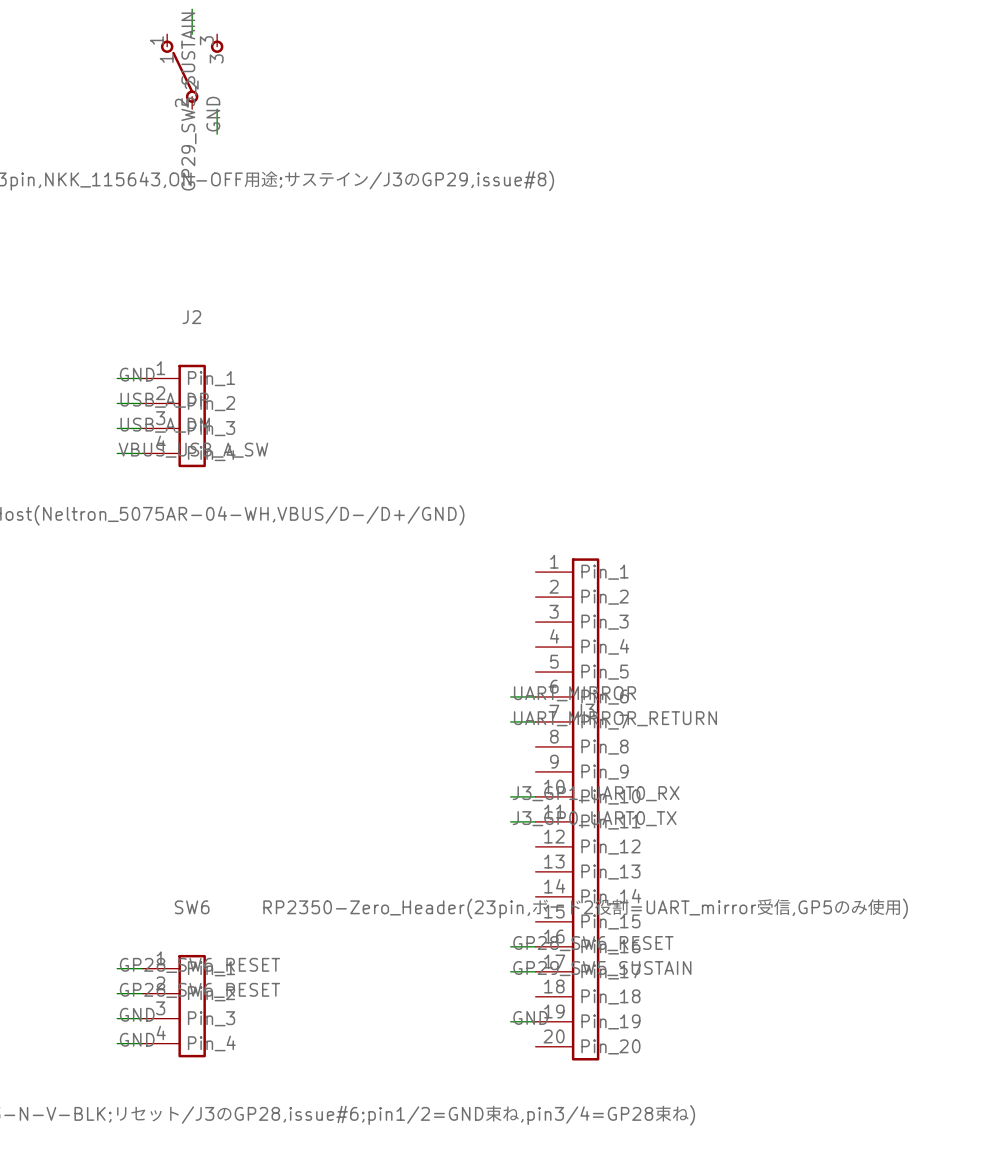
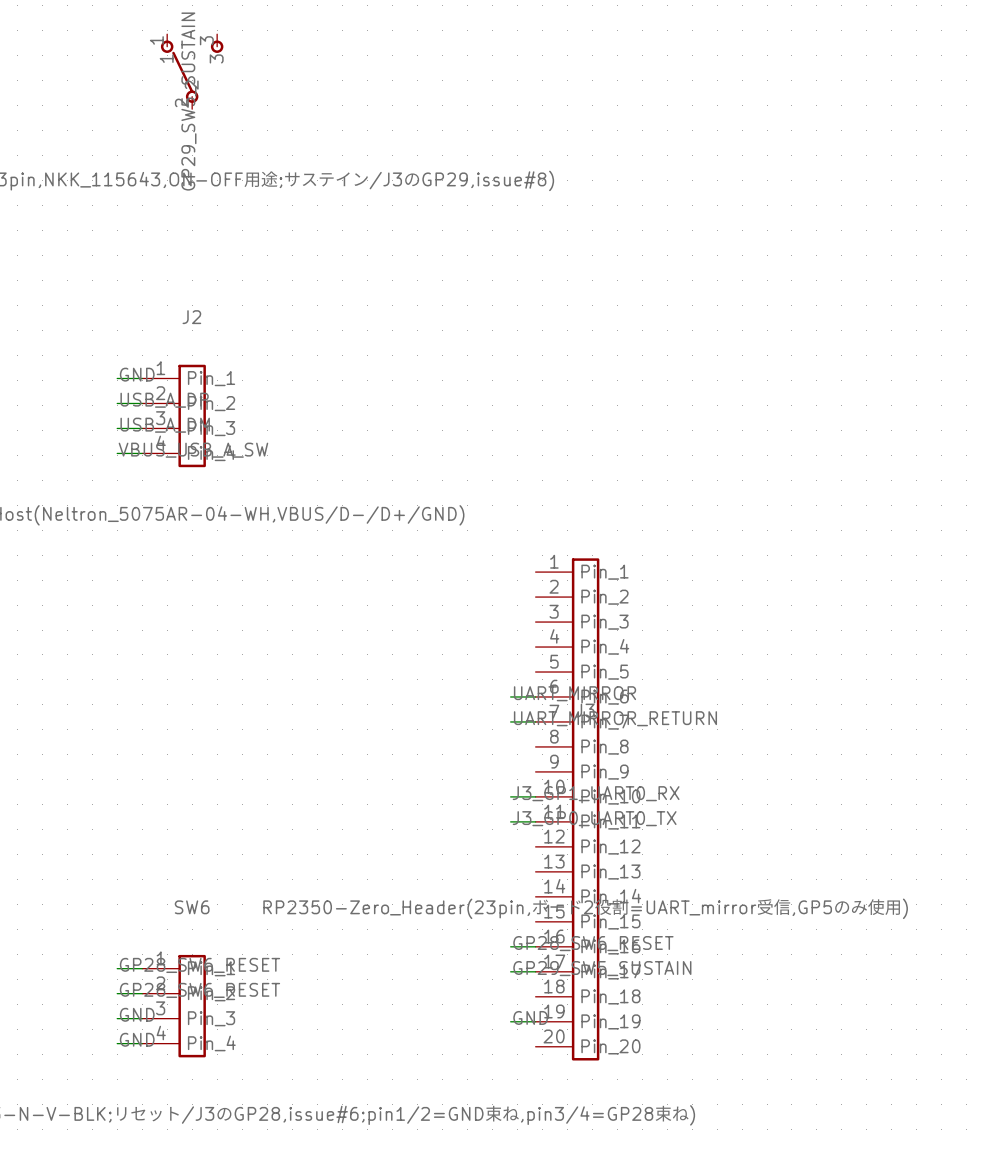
wire: (192, 9) (192, 34) -> none
wire: (217, 109) (217, 134) -> none
label: GND (213, 114) -> none

